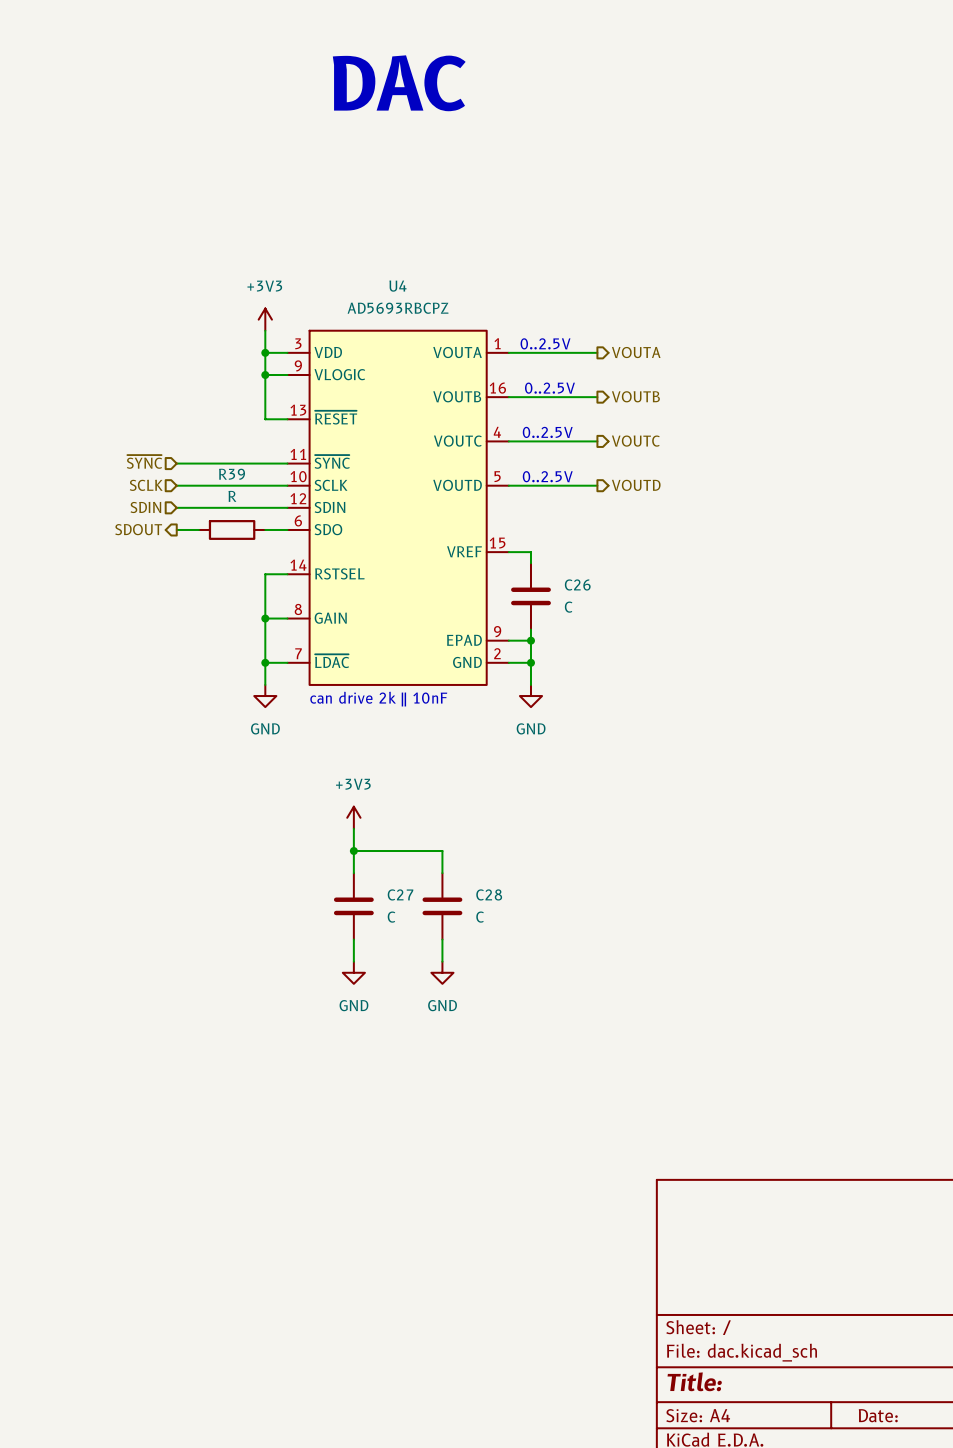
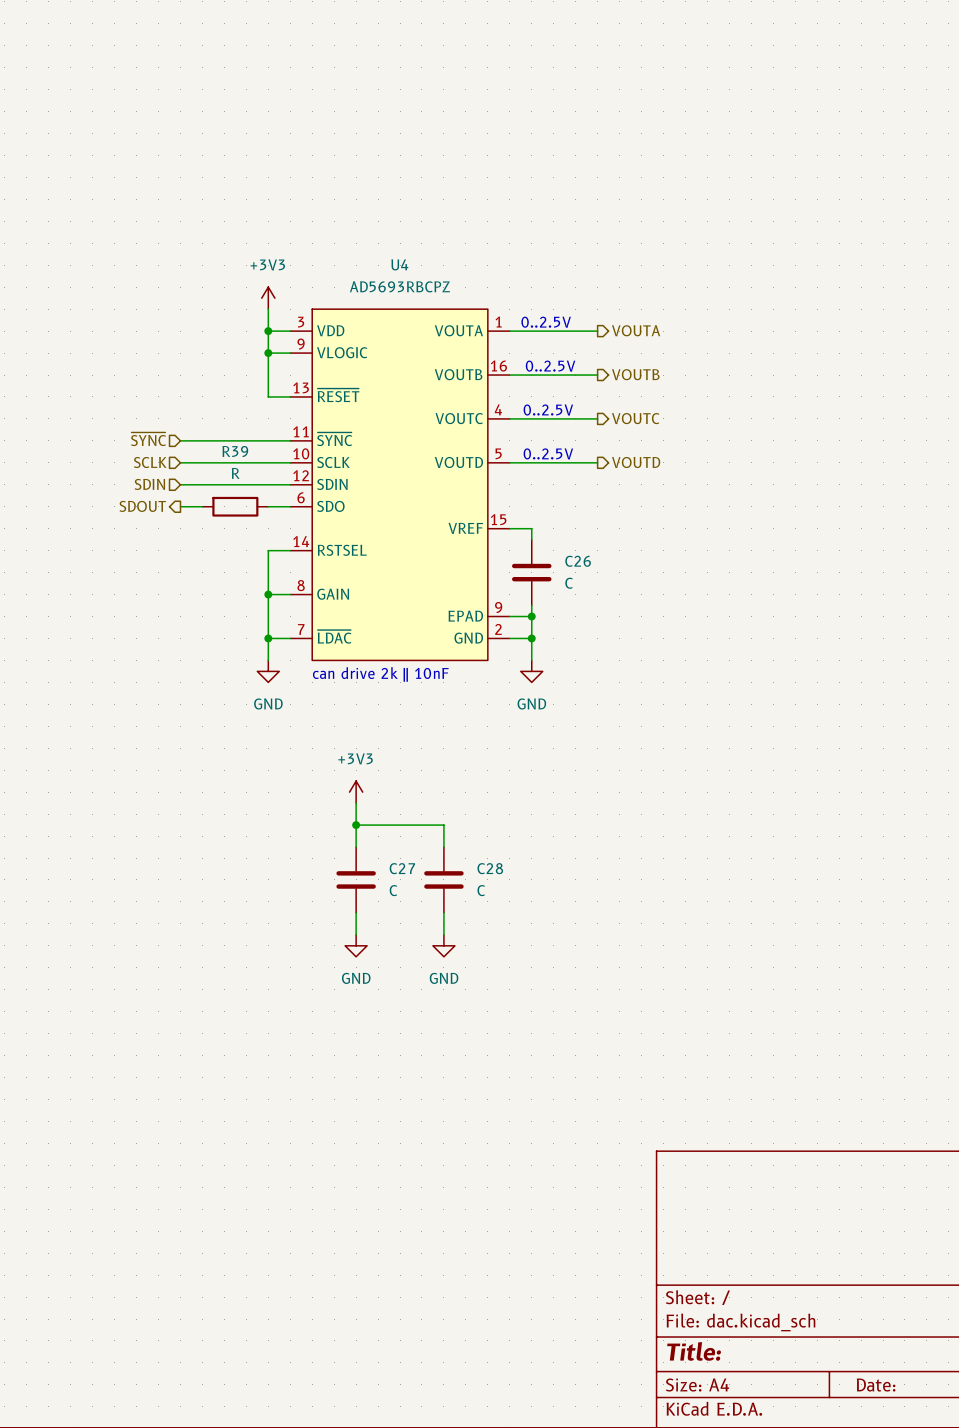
text: DAC (399, 83) -> none

